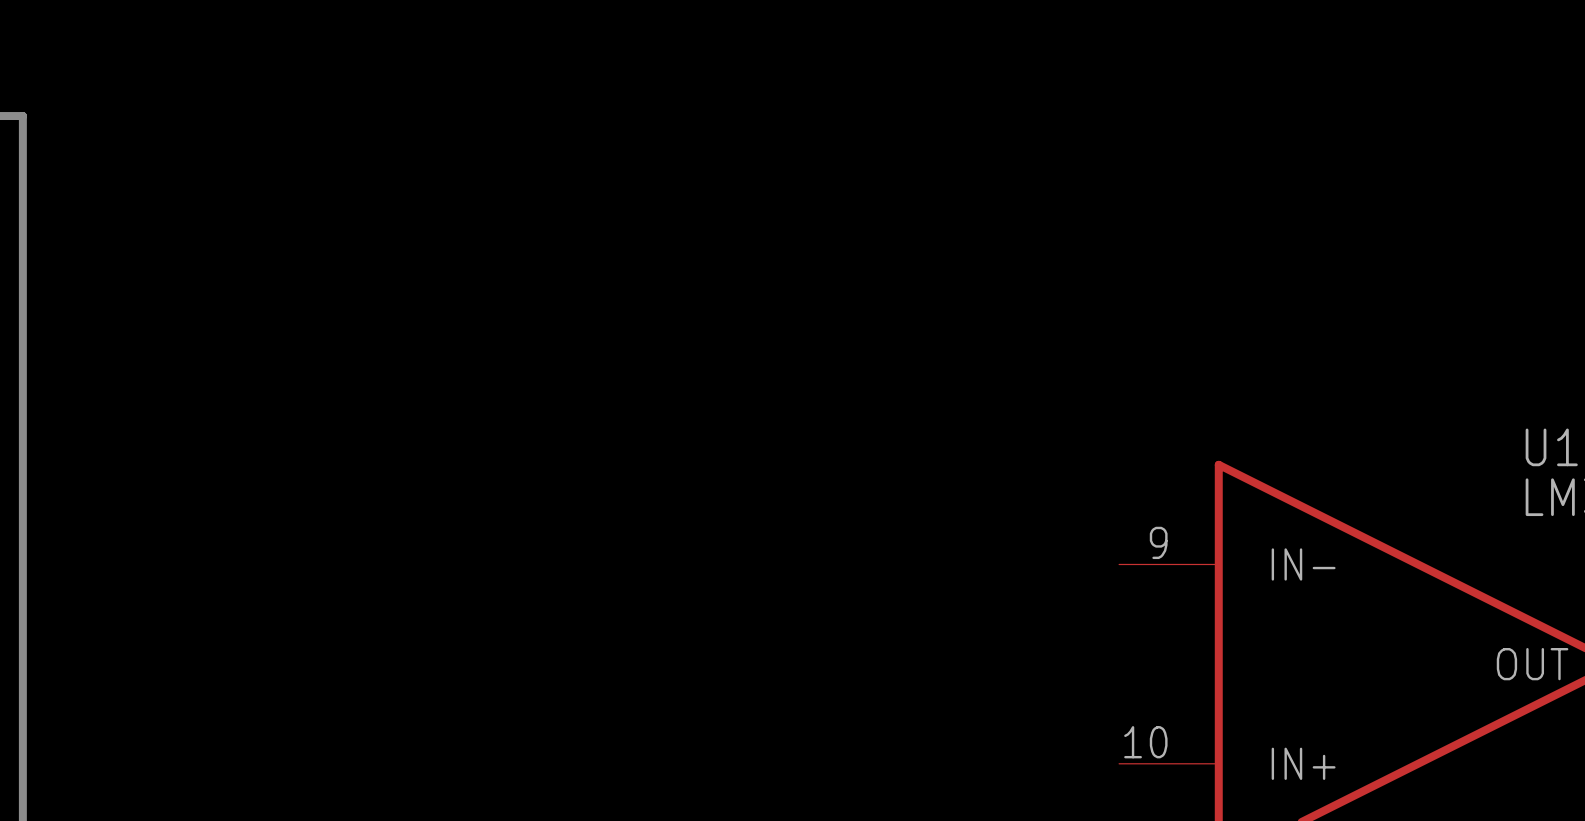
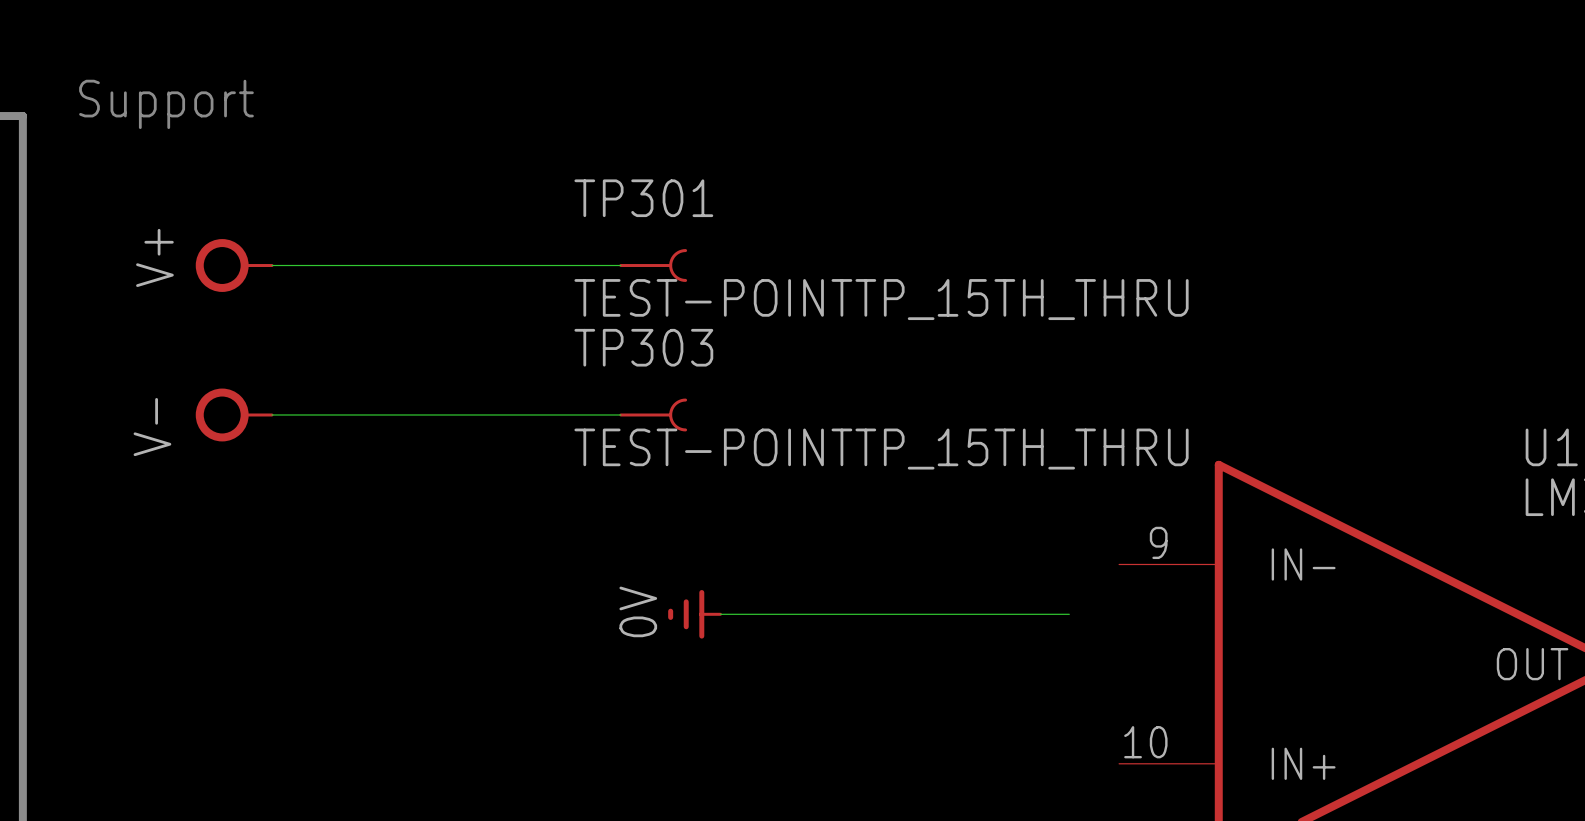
text: none -> Support (166, 104)
power symbol: none -> V+ (234, 265)
wire: none -> (272, 265) (620, 265)
TP301: none -> TEST-POINTTP_15TH_THRU (653, 265)
power symbol: none -> V- (234, 414)
wire: none -> (272, 414) (620, 414)
TP303: none -> TEST-POINTTP_15TH_THRU (653, 414)
power symbol: none -> 0V (695, 614)
wire: none -> (720, 614) (1069, 614)

